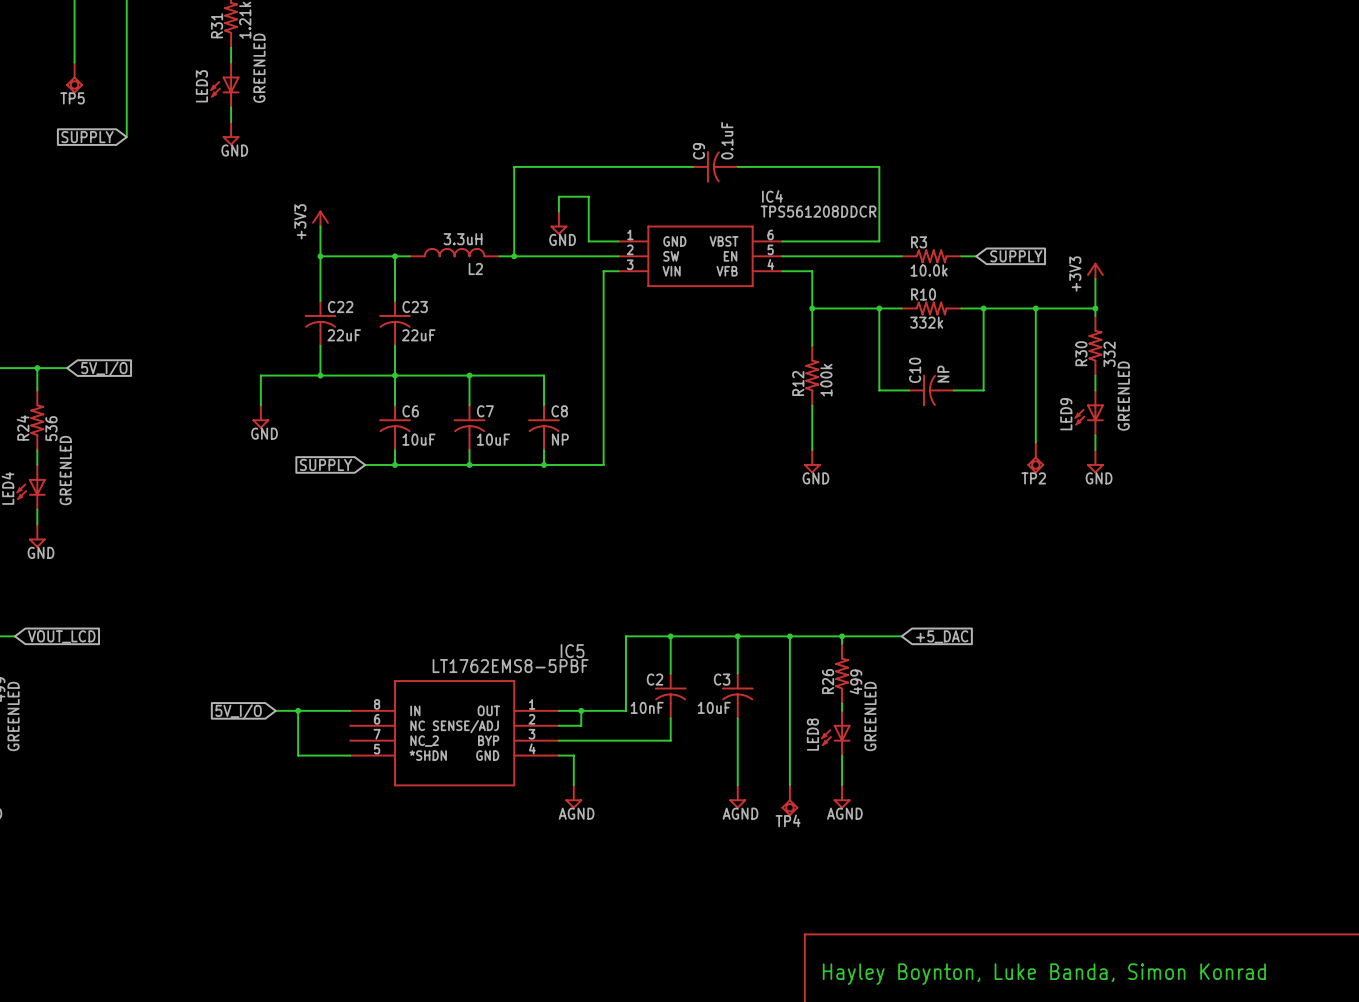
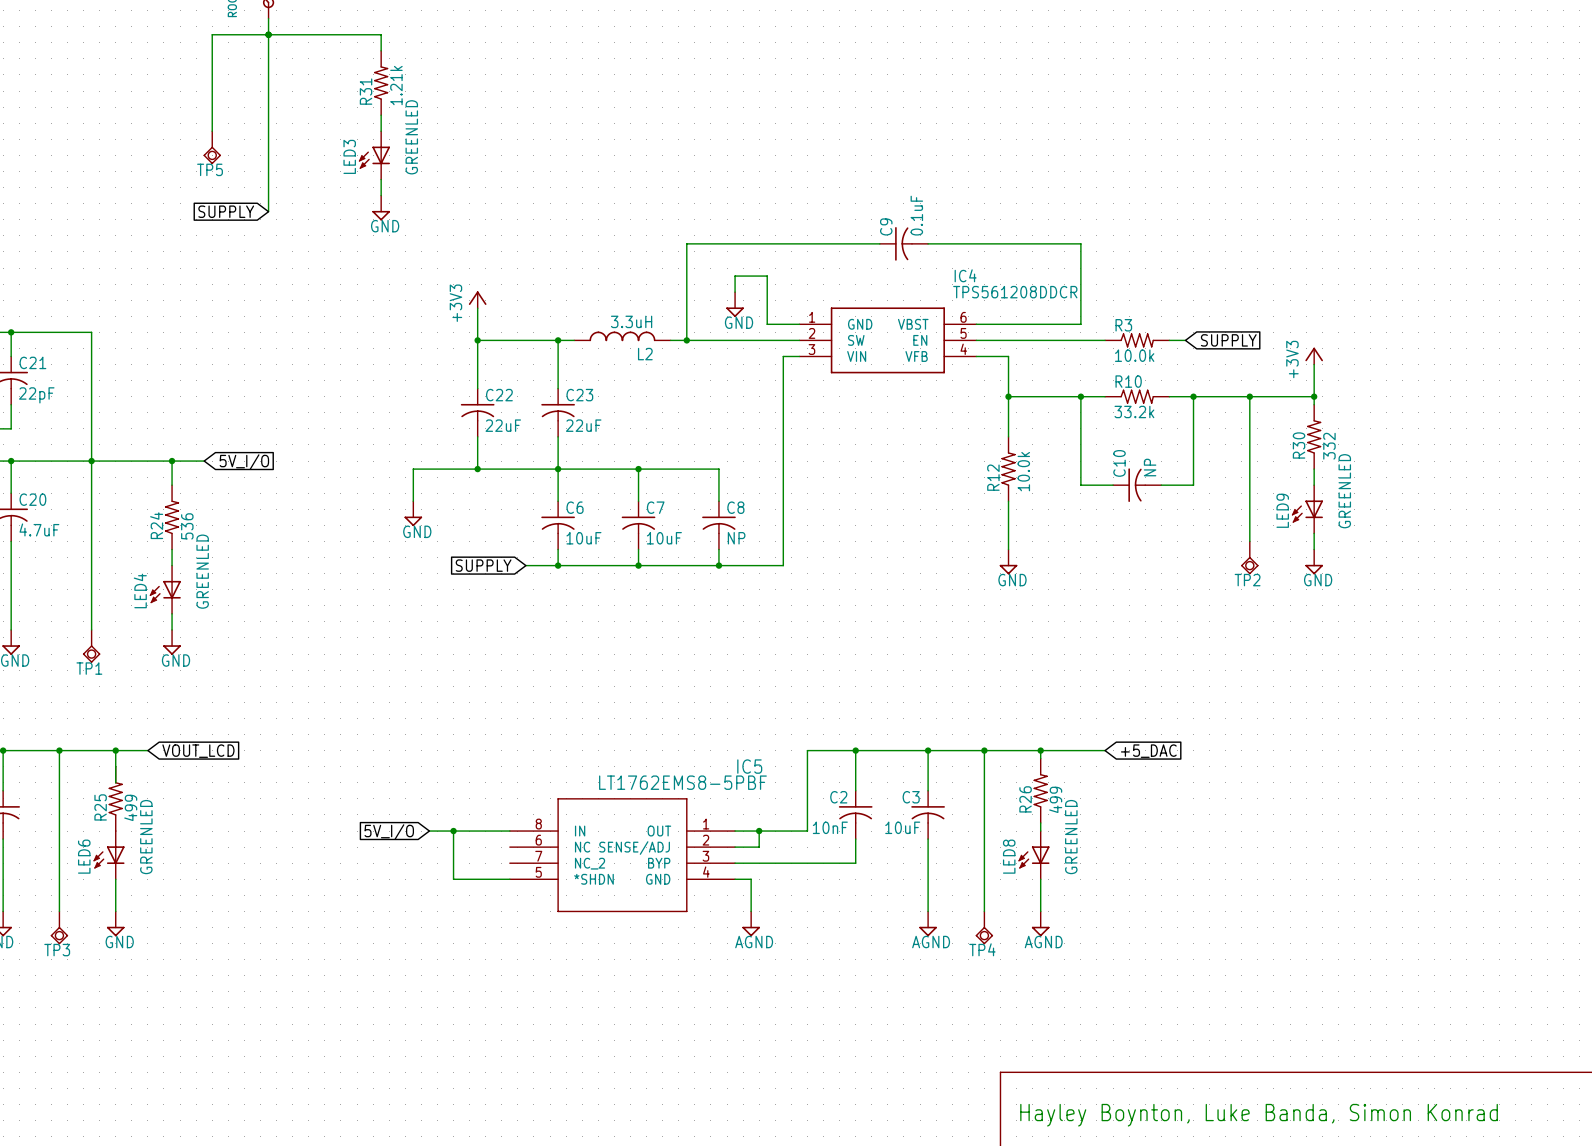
R10 value: 332k (926, 322) -> 33.2k (1134, 411)
R12 value: 100k (826, 380) -> 10.0k (1023, 471)

